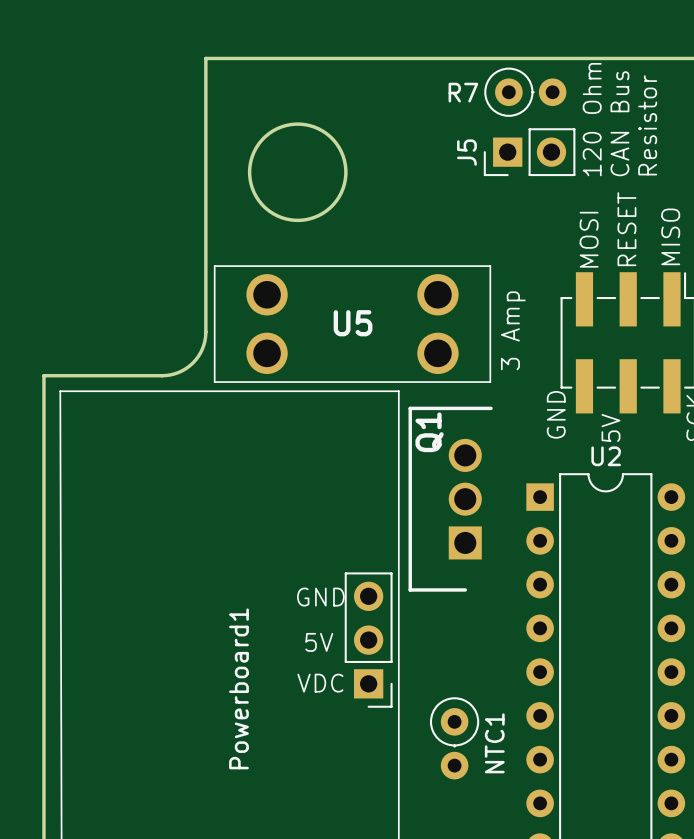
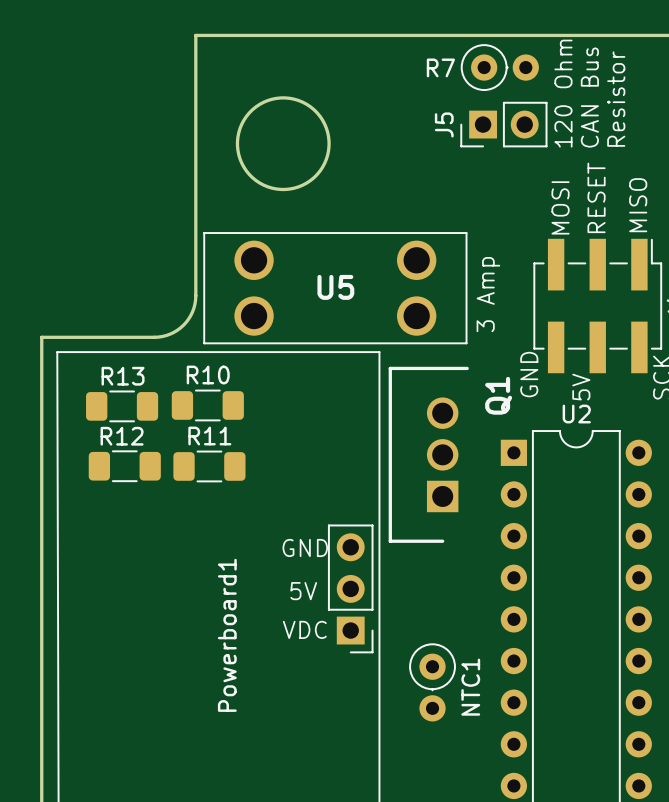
Q1 name position: Q1 (429, 432) -> Q1 (498, 395)
R10: none -> (207, 405)
R13: none -> (122, 406)
R12: none -> (124, 466)
R11: none -> (209, 466)

